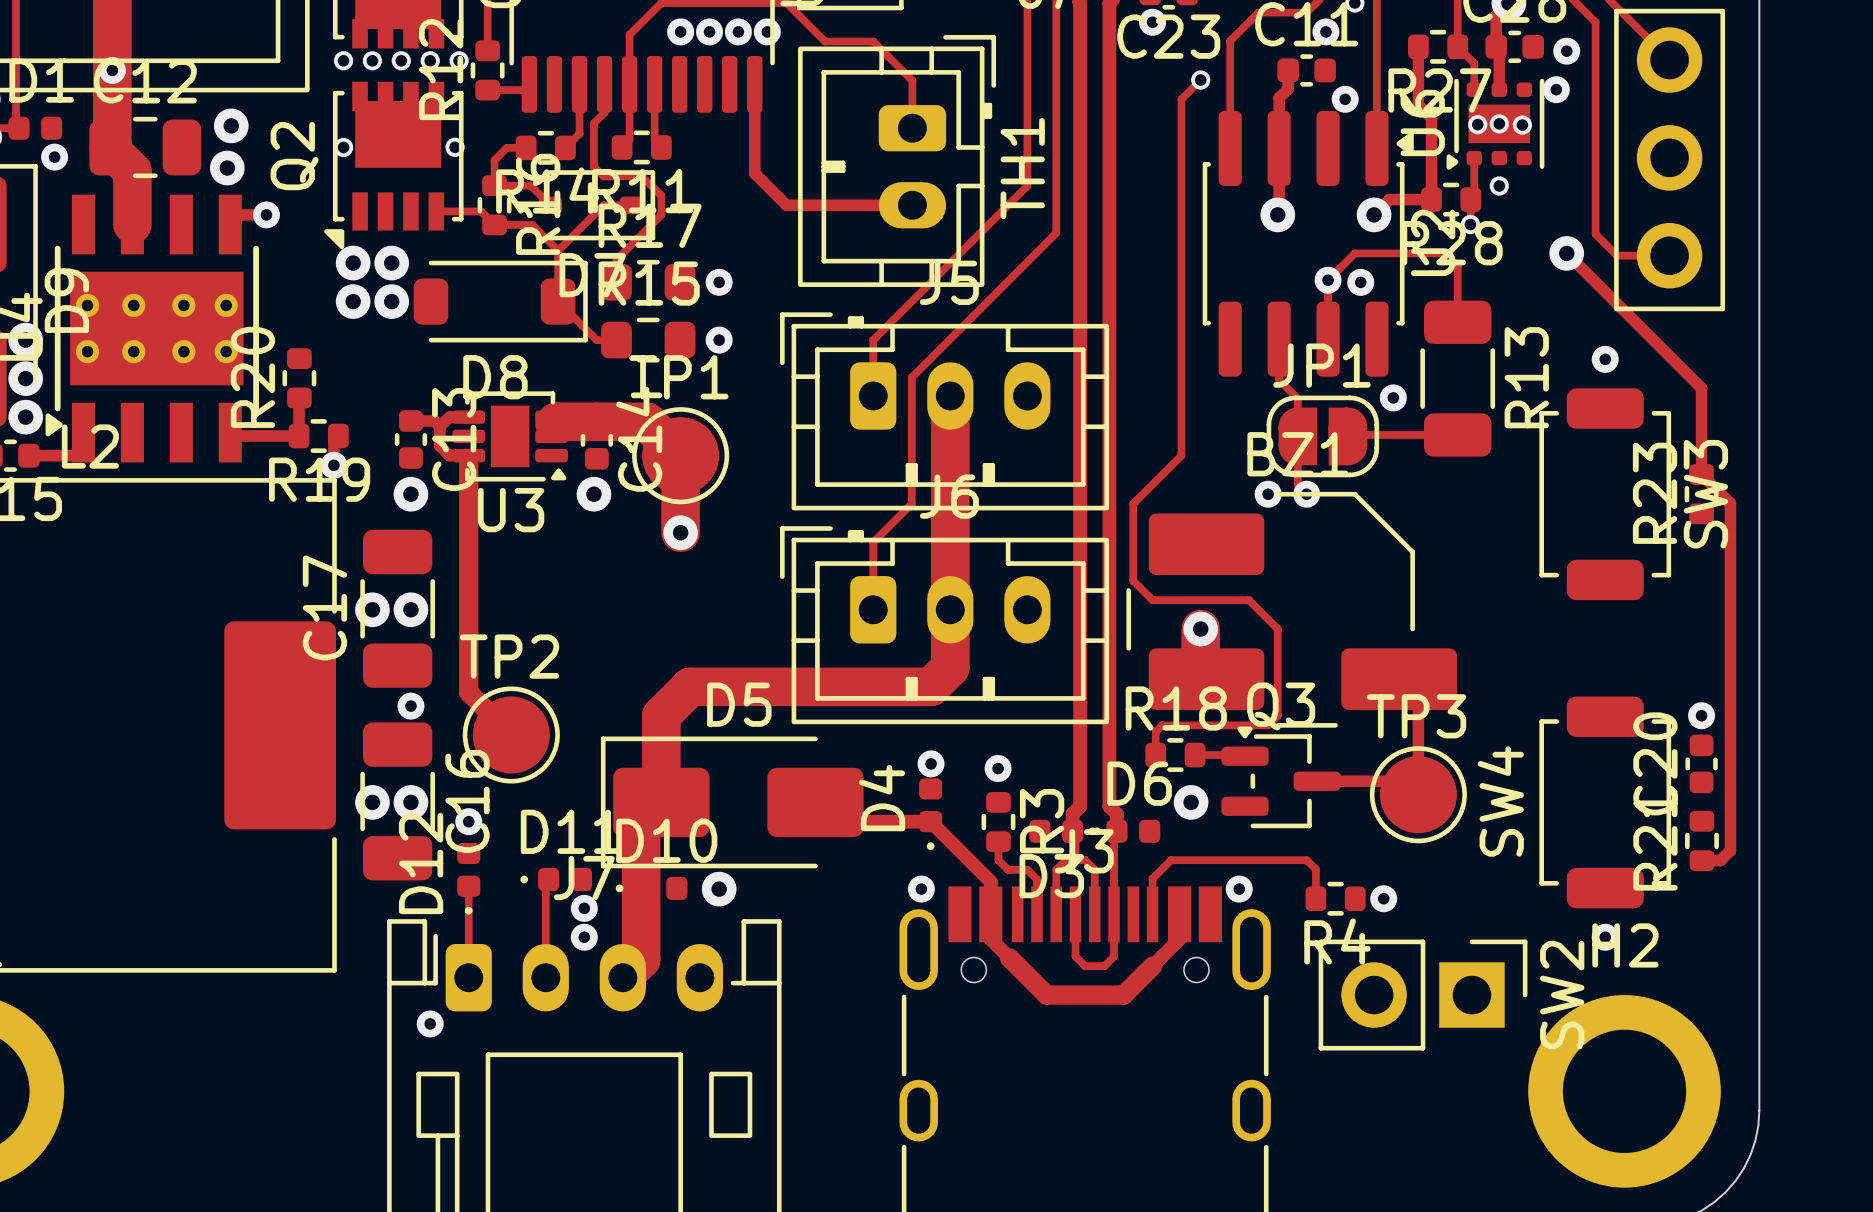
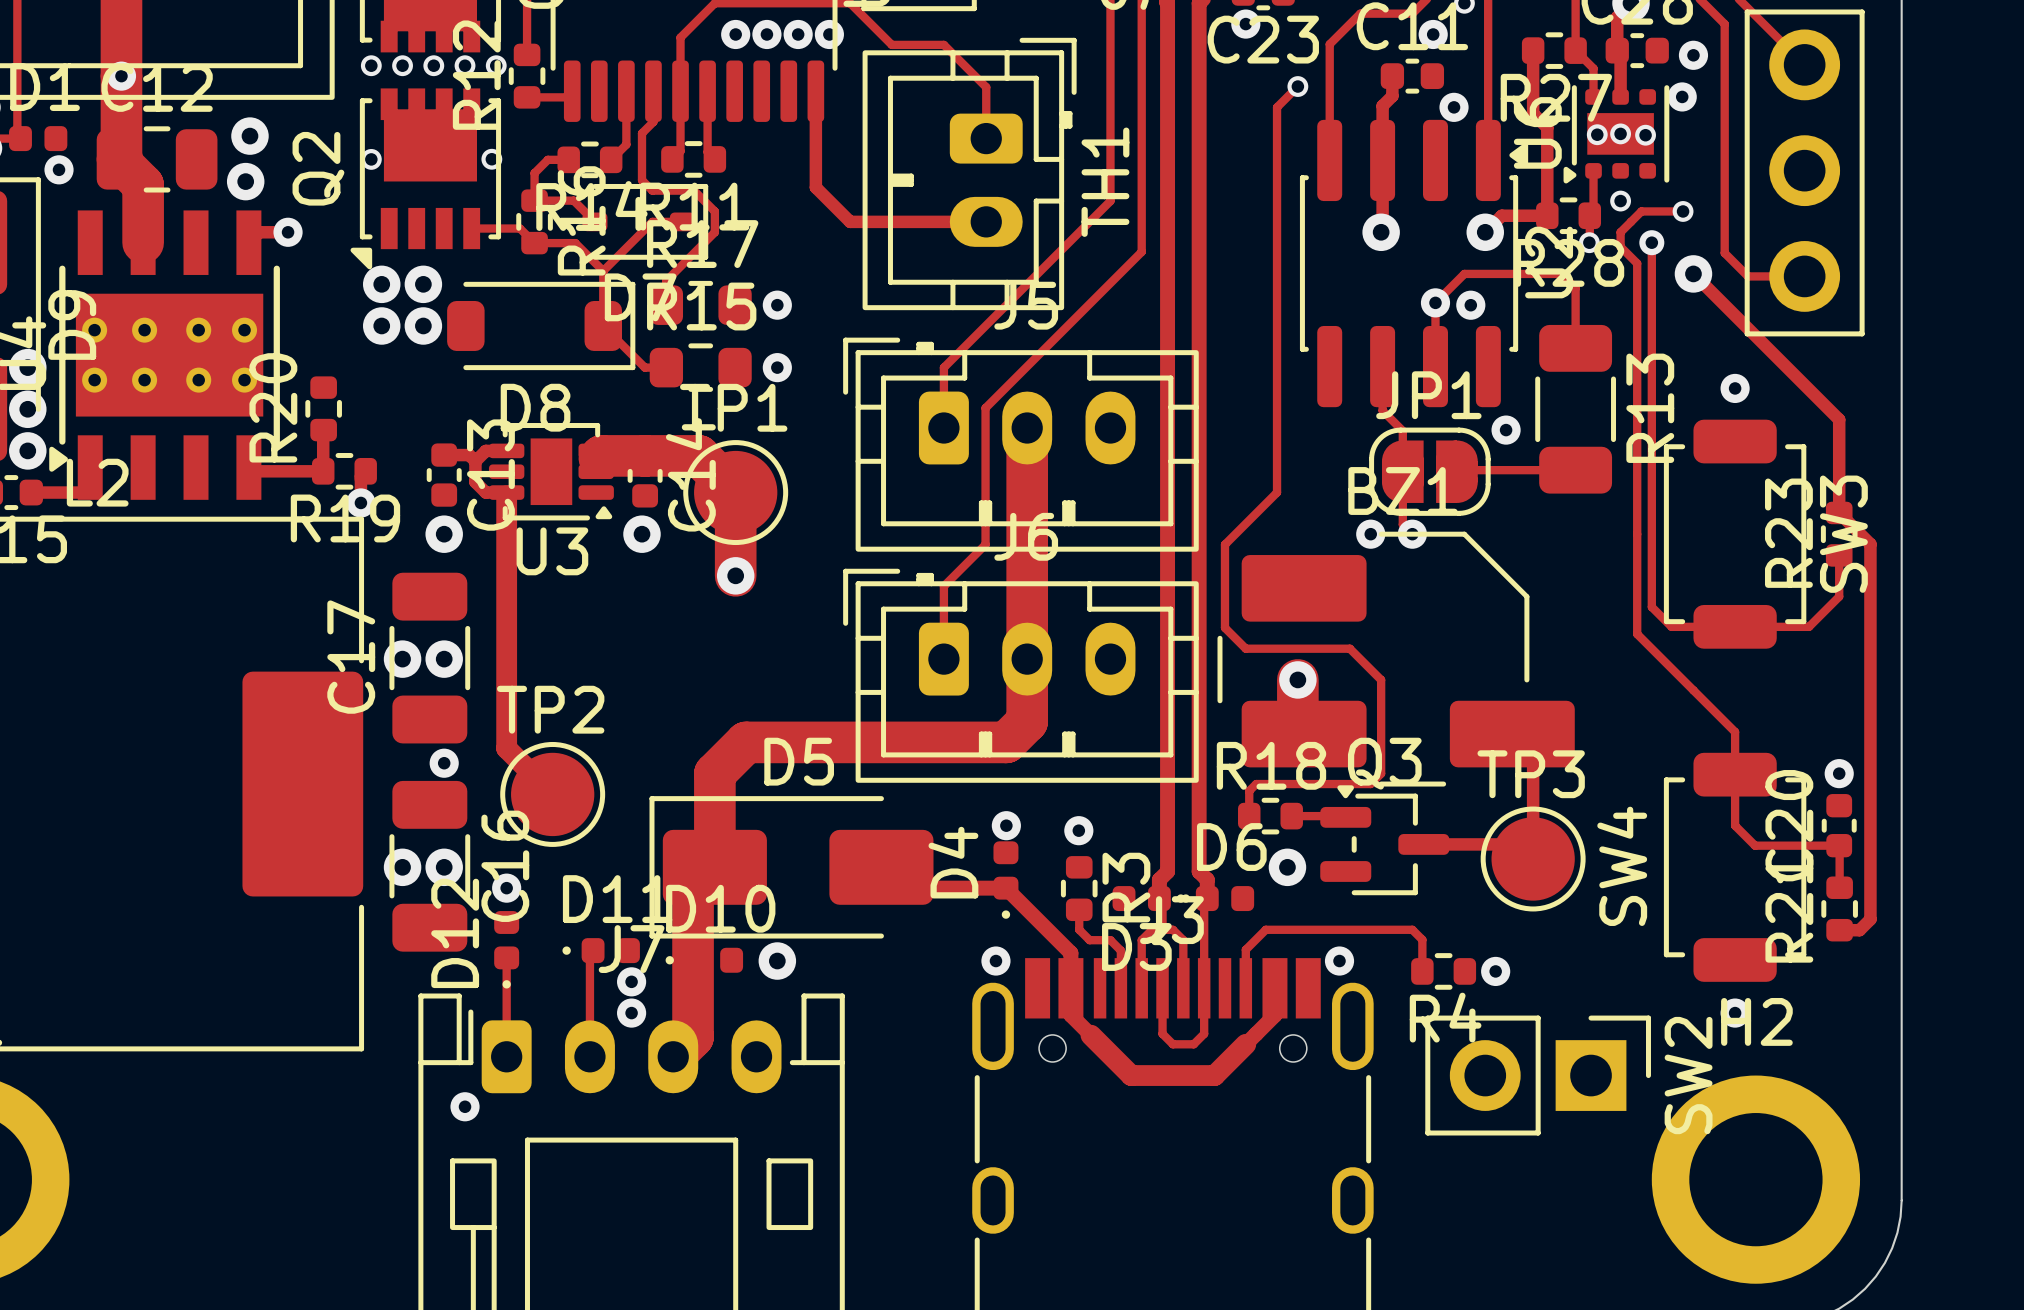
track: none -> (1683, 211) (1641, 211) (1620, 232) (1620, 246) (1637, 263) (1637, 634) (1735, 731) (1735, 825) (1755, 845) (1839, 845)
via: none -> (1683, 211)
track: none -> (1651, 242) (1651, 607) (1671, 626) (1809, 626) (1839, 596) (1839, 555)
via: none -> (1651, 242)
track: none -> (1839, 846) (1839, 887)

